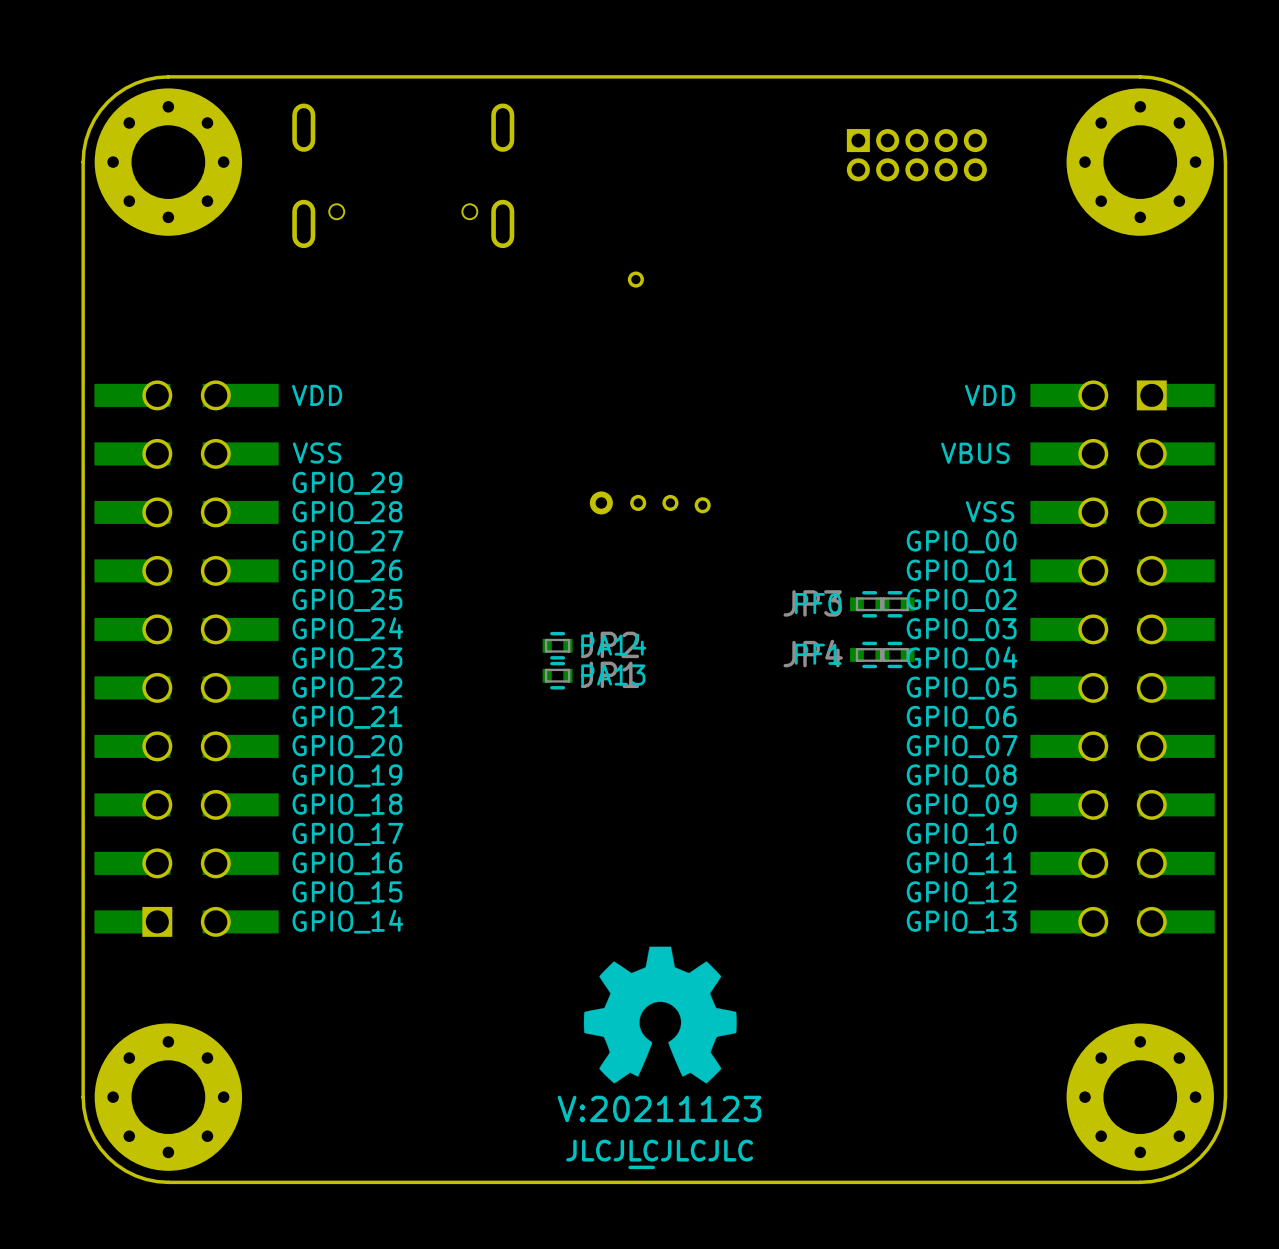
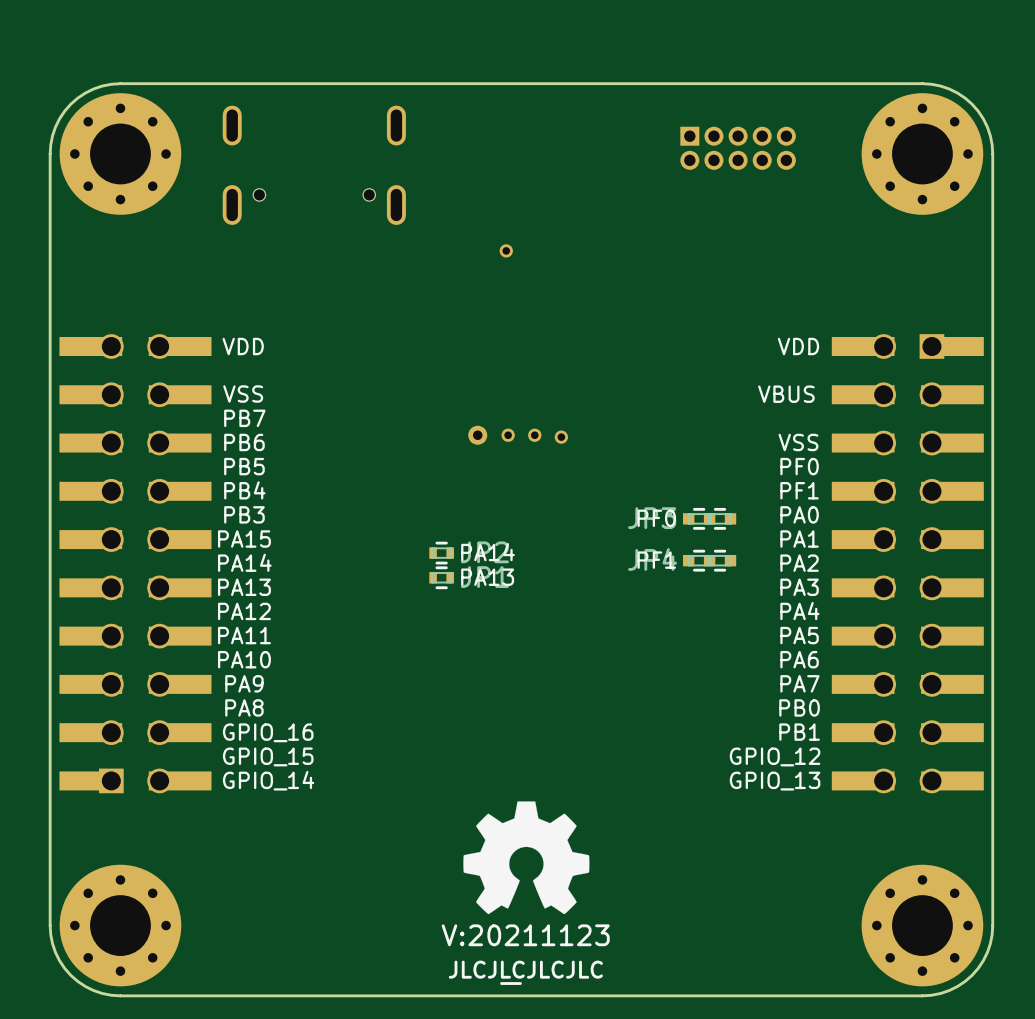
part footprint: [94, 380, 279, 937] -> [59, 334, 212, 794]
part footprint: [1030, 380, 1215, 937] -> [831, 334, 984, 794]

